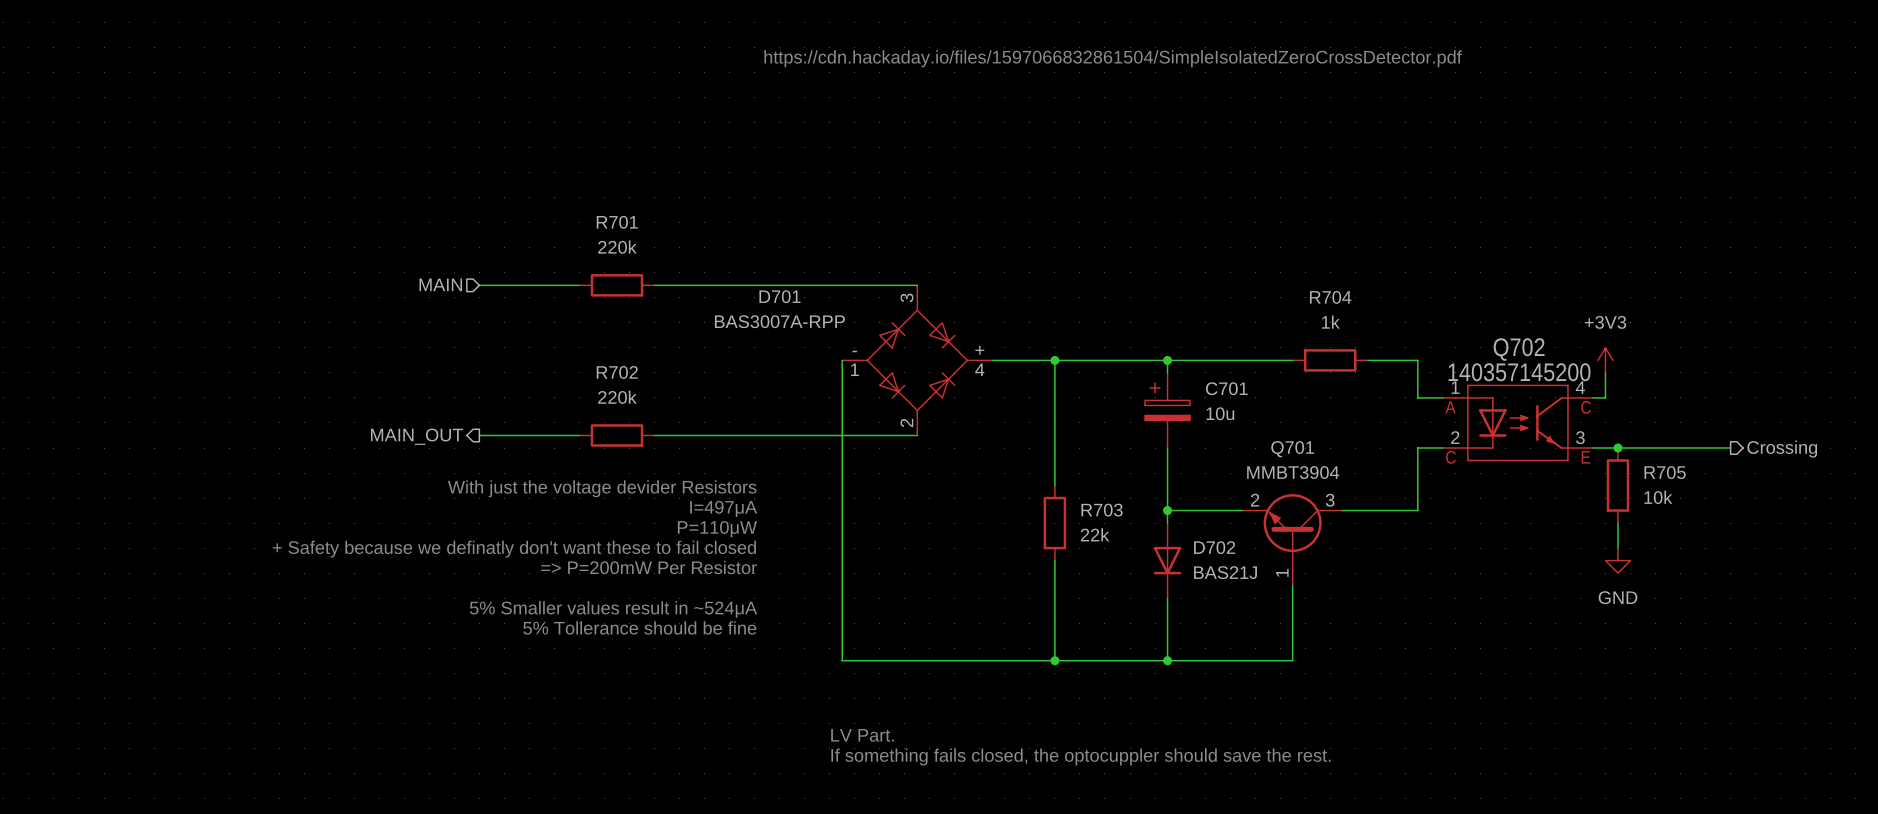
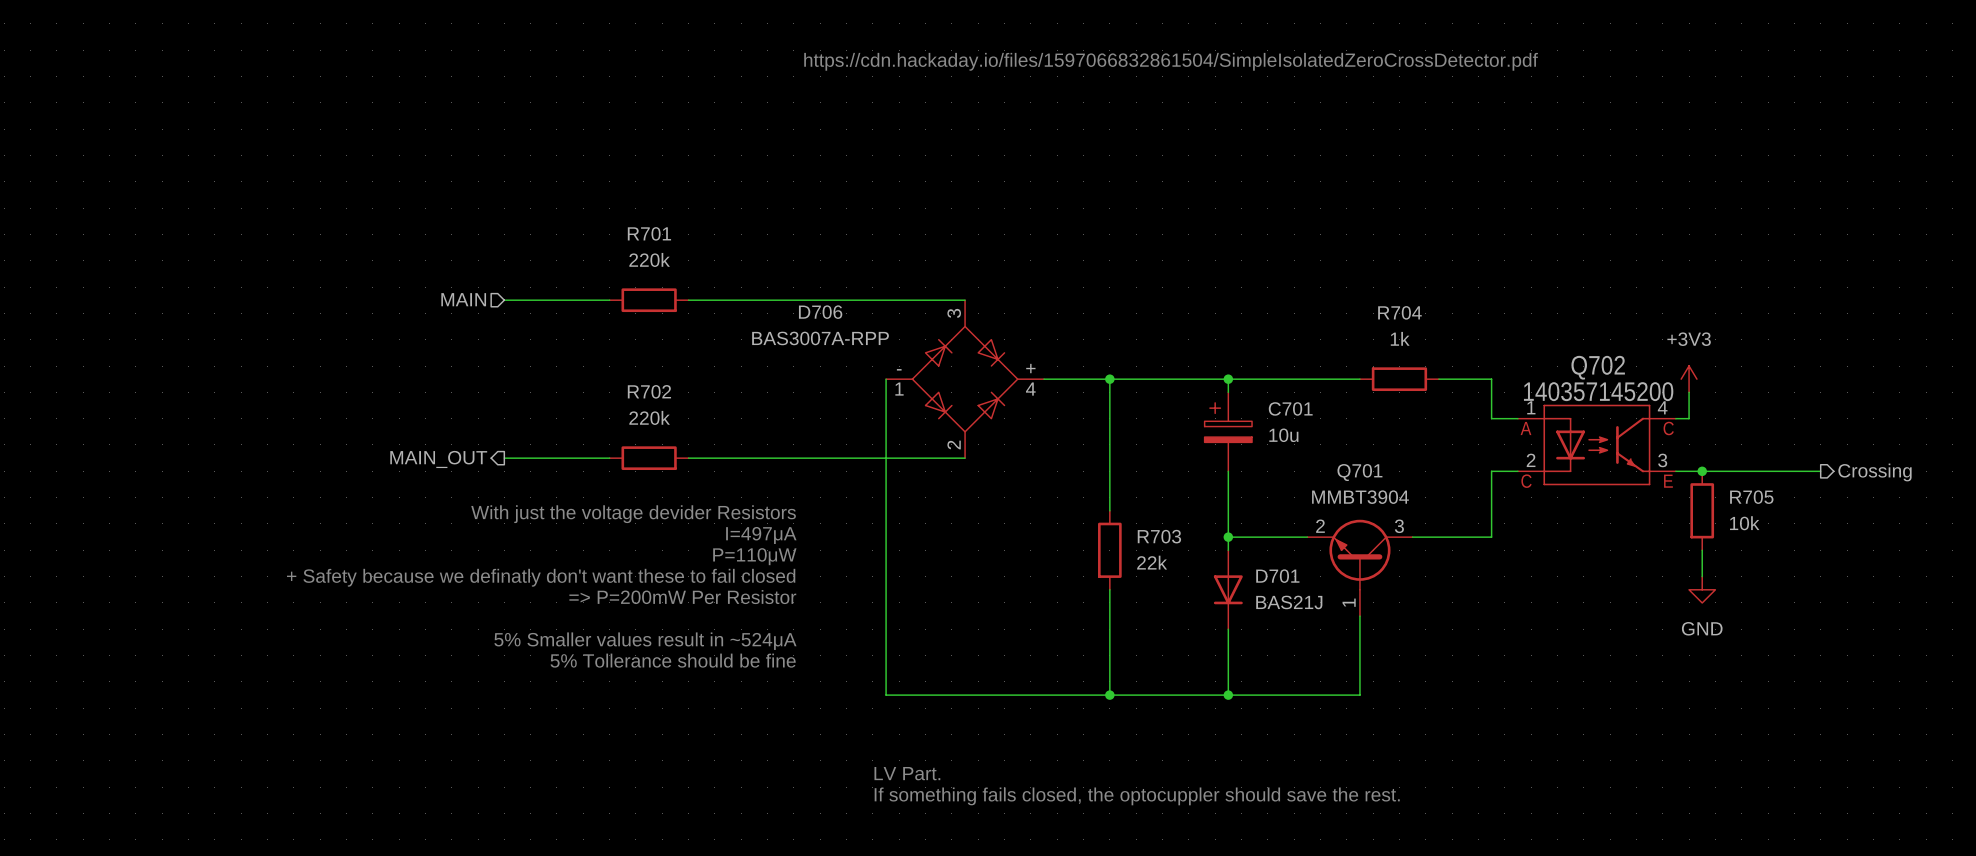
D701 name: D701 (779, 296) -> D706 (820, 312)
D702 name: D702 (1214, 547) -> D701 (1277, 576)

